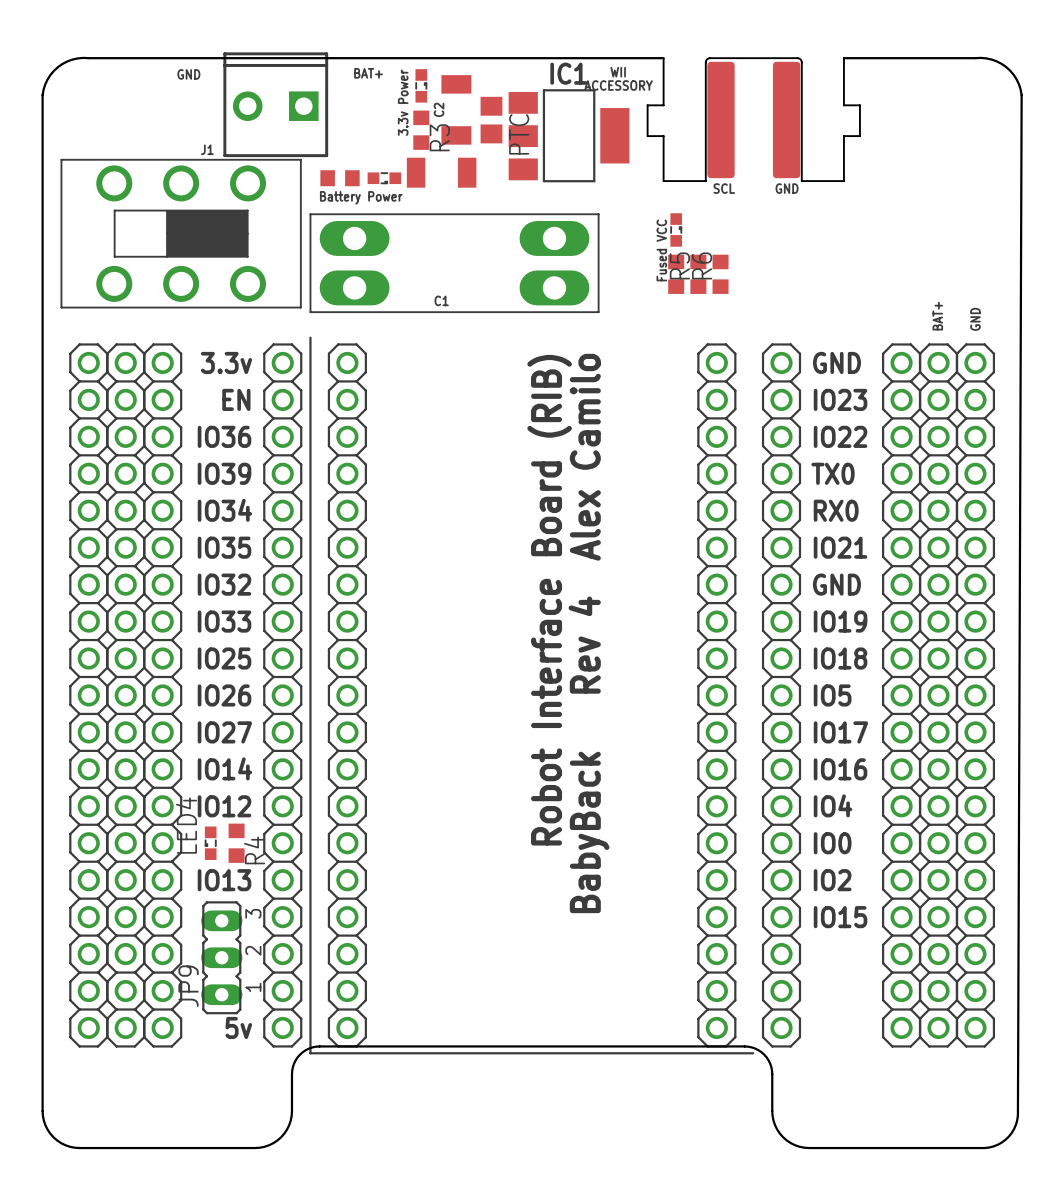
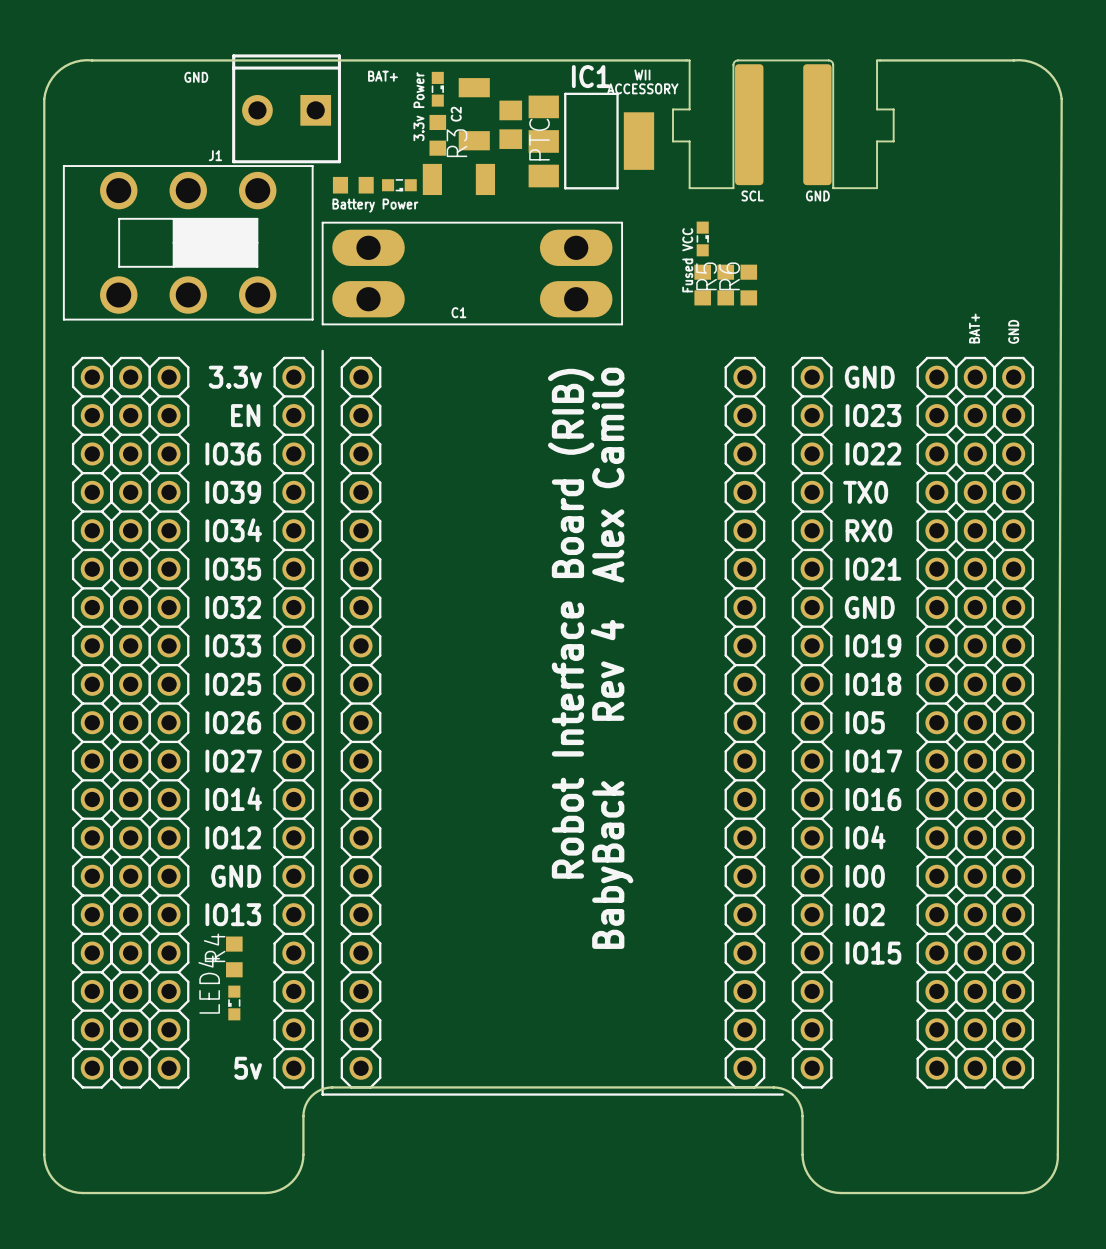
LED4 position: (210, 843) -> (234, 1002)
text: none -> GND (236, 876)
R4 position: (236, 843) -> (234, 956)
R4 name position: R4 (254, 850) -> R4 (214, 947)
JP9: (221, 957) -> none

